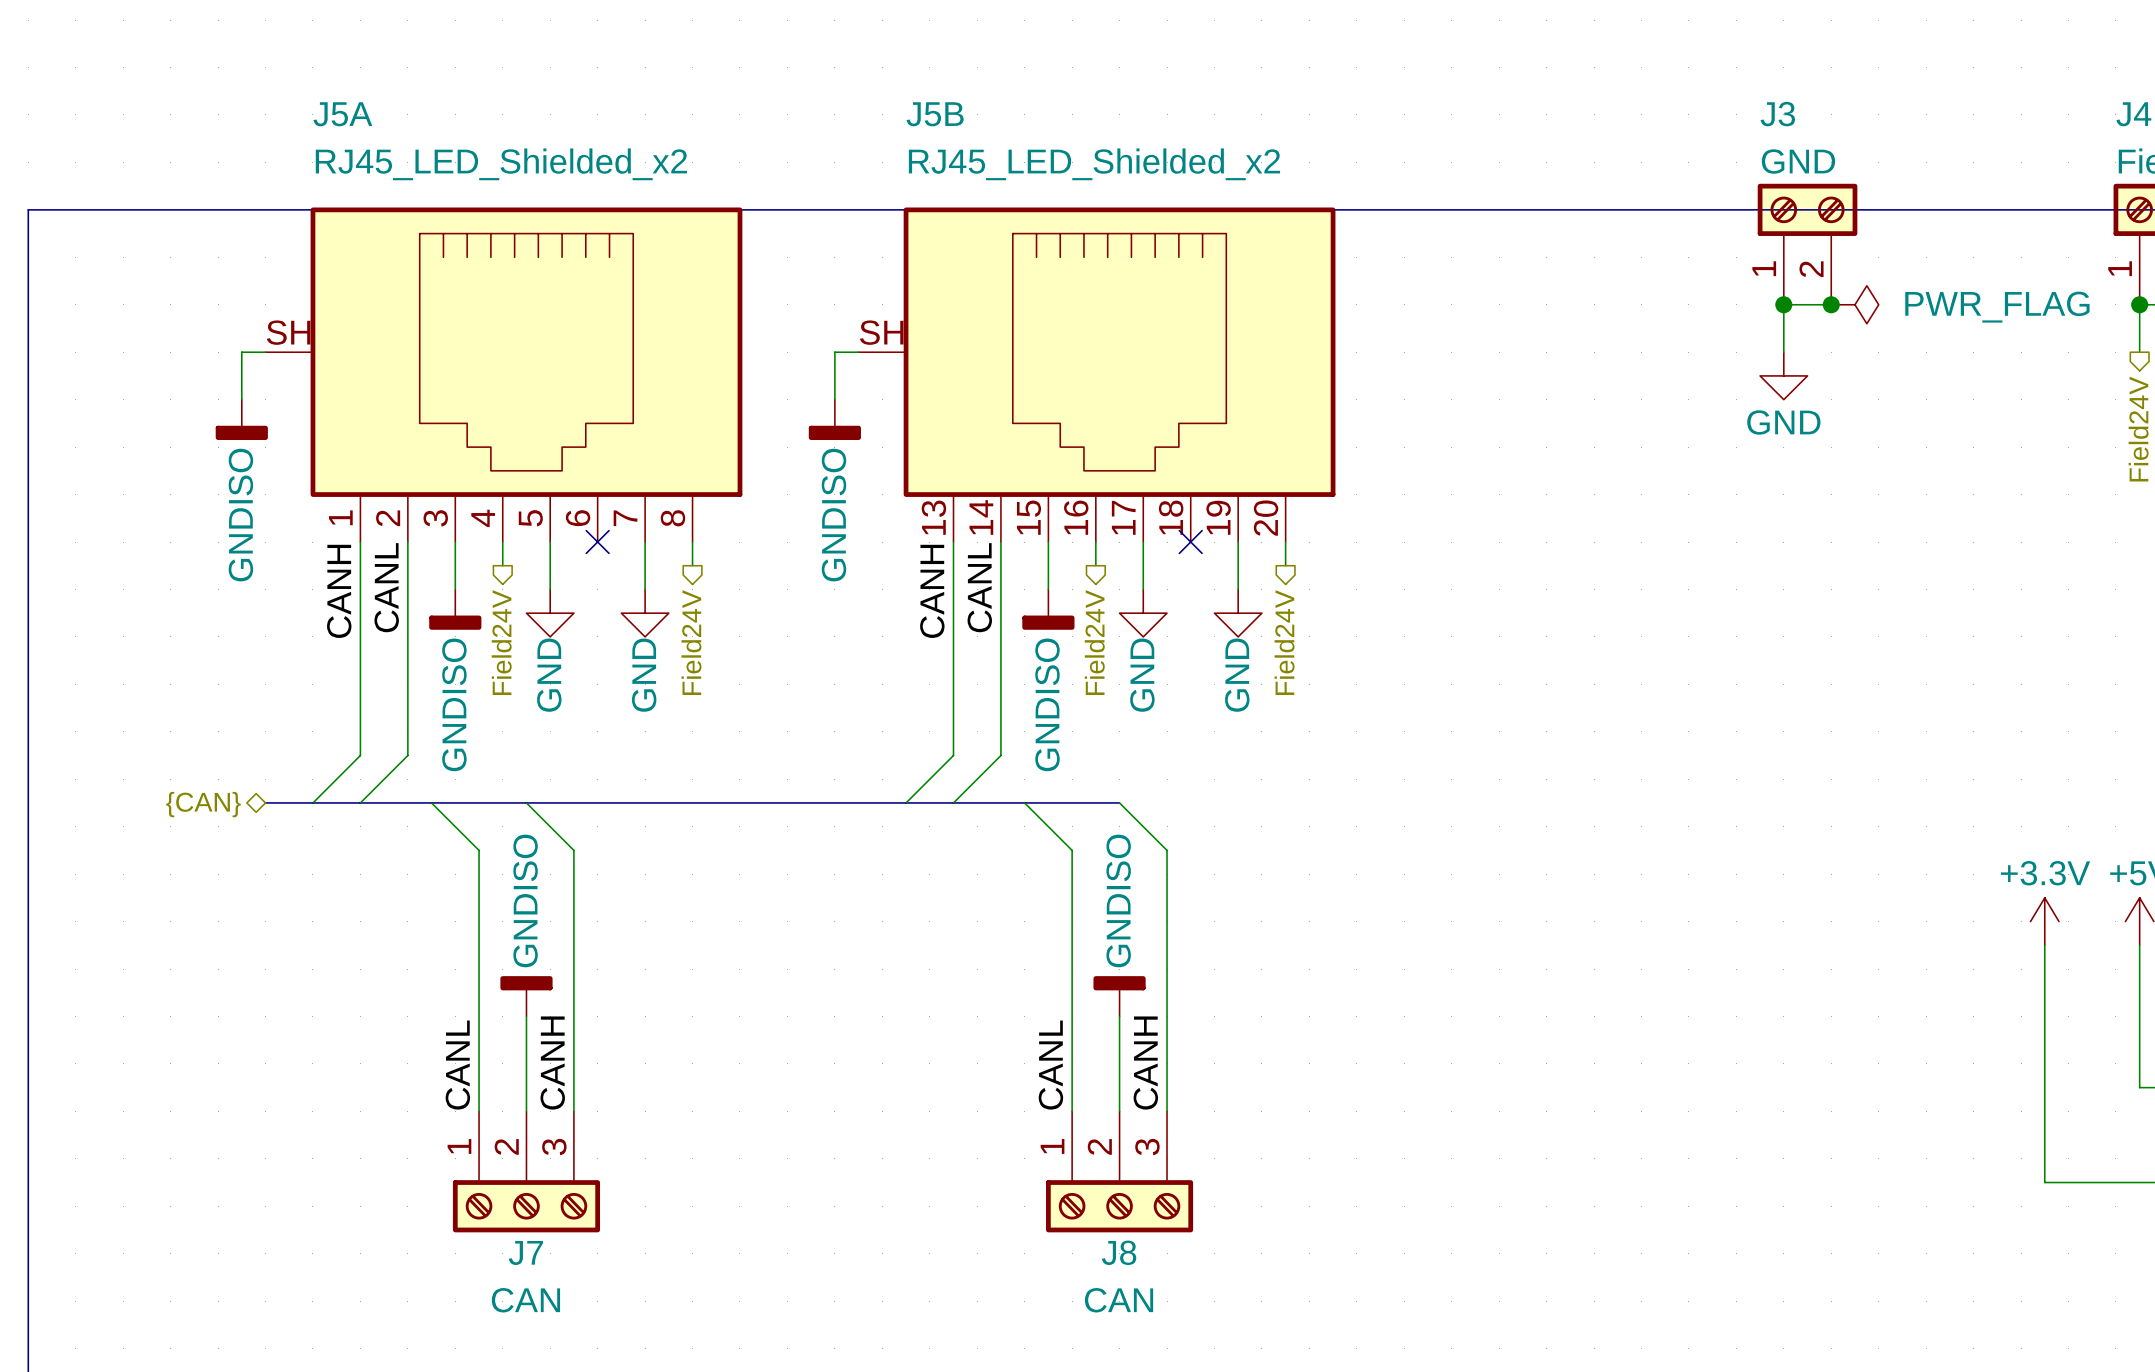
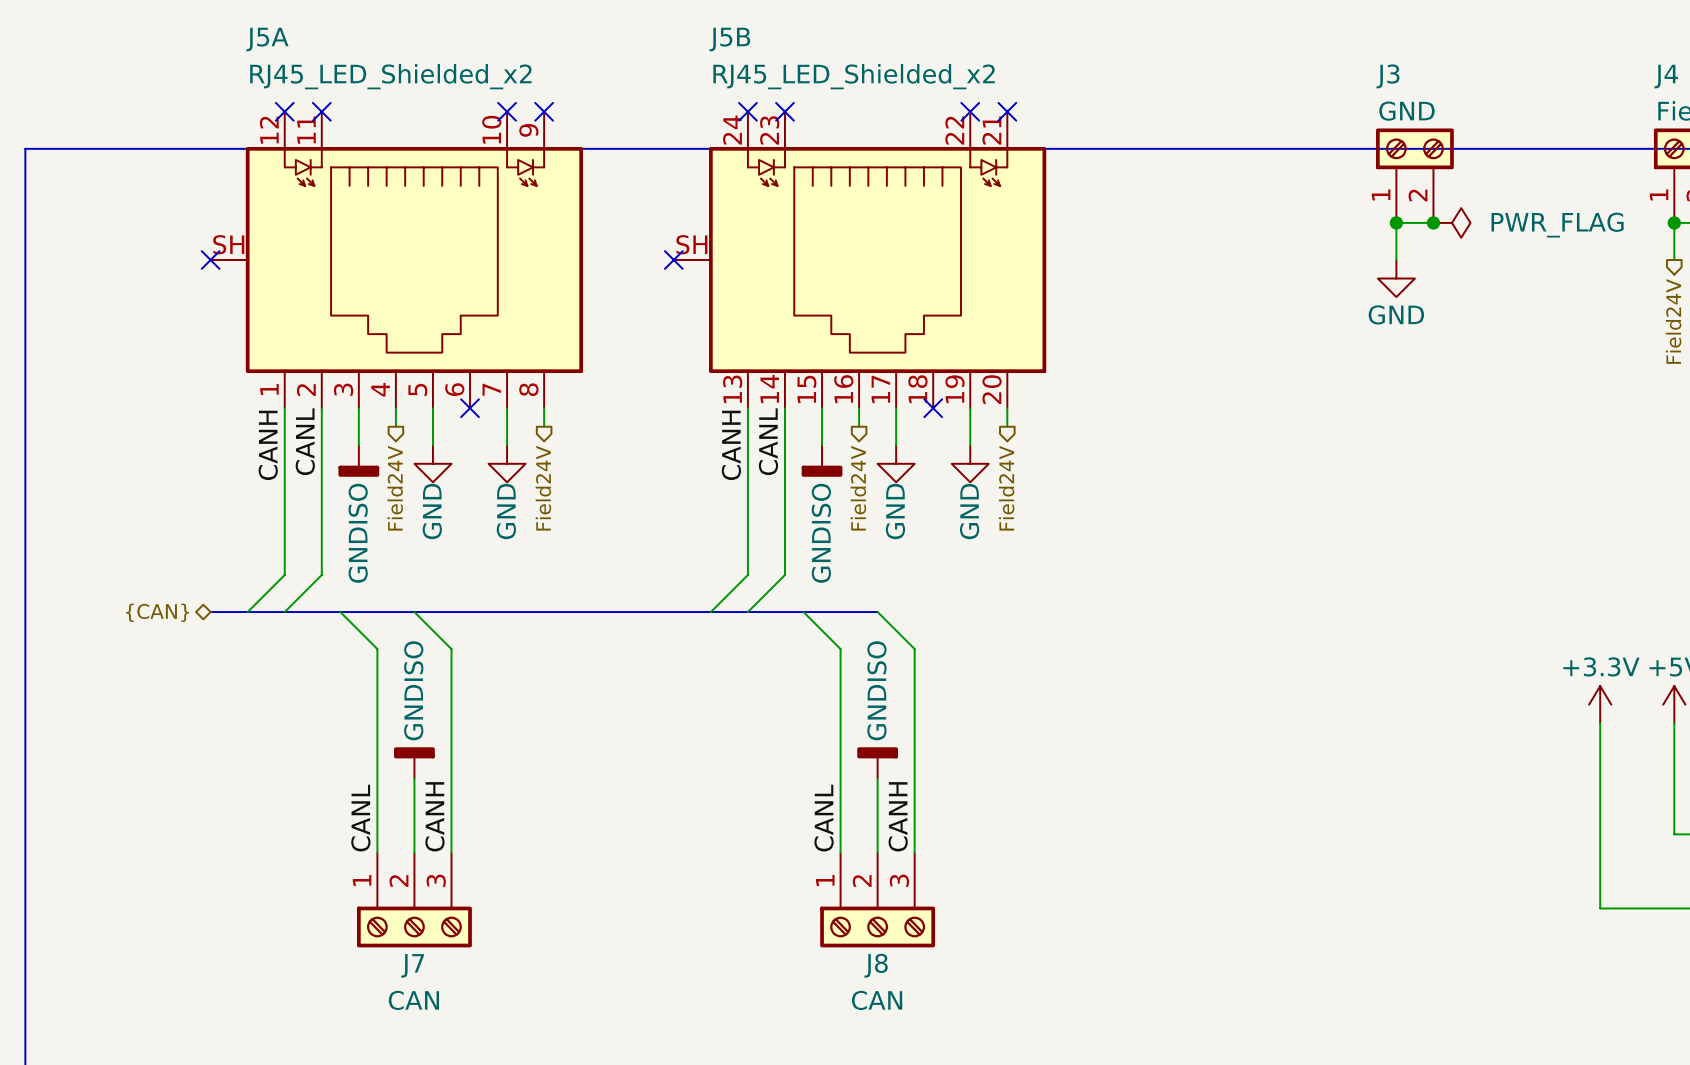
no-connect mark: none -> (284, 111)
no-connect mark: none -> (321, 111)
no-connect mark: none -> (507, 111)
no-connect mark: none -> (544, 111)
no-connect mark: none -> (747, 111)
no-connect mark: none -> (784, 111)
no-connect mark: none -> (970, 111)
no-connect mark: none -> (1007, 111)
J5A symbol: [265, 207, 743, 543] -> [210, 111, 584, 409]
J5B symbol: [858, 207, 1336, 543] -> [673, 111, 1047, 409]
wire: (265, 352) (241, 352) (241, 399) -> none
no-connect mark: none -> (210, 260)
wire: (858, 352) (834, 352) (834, 399) -> none
no-connect mark: none -> (673, 260)
power symbol: GNDISO (241, 419) -> none
power symbol: GNDISO (834, 419) -> none

